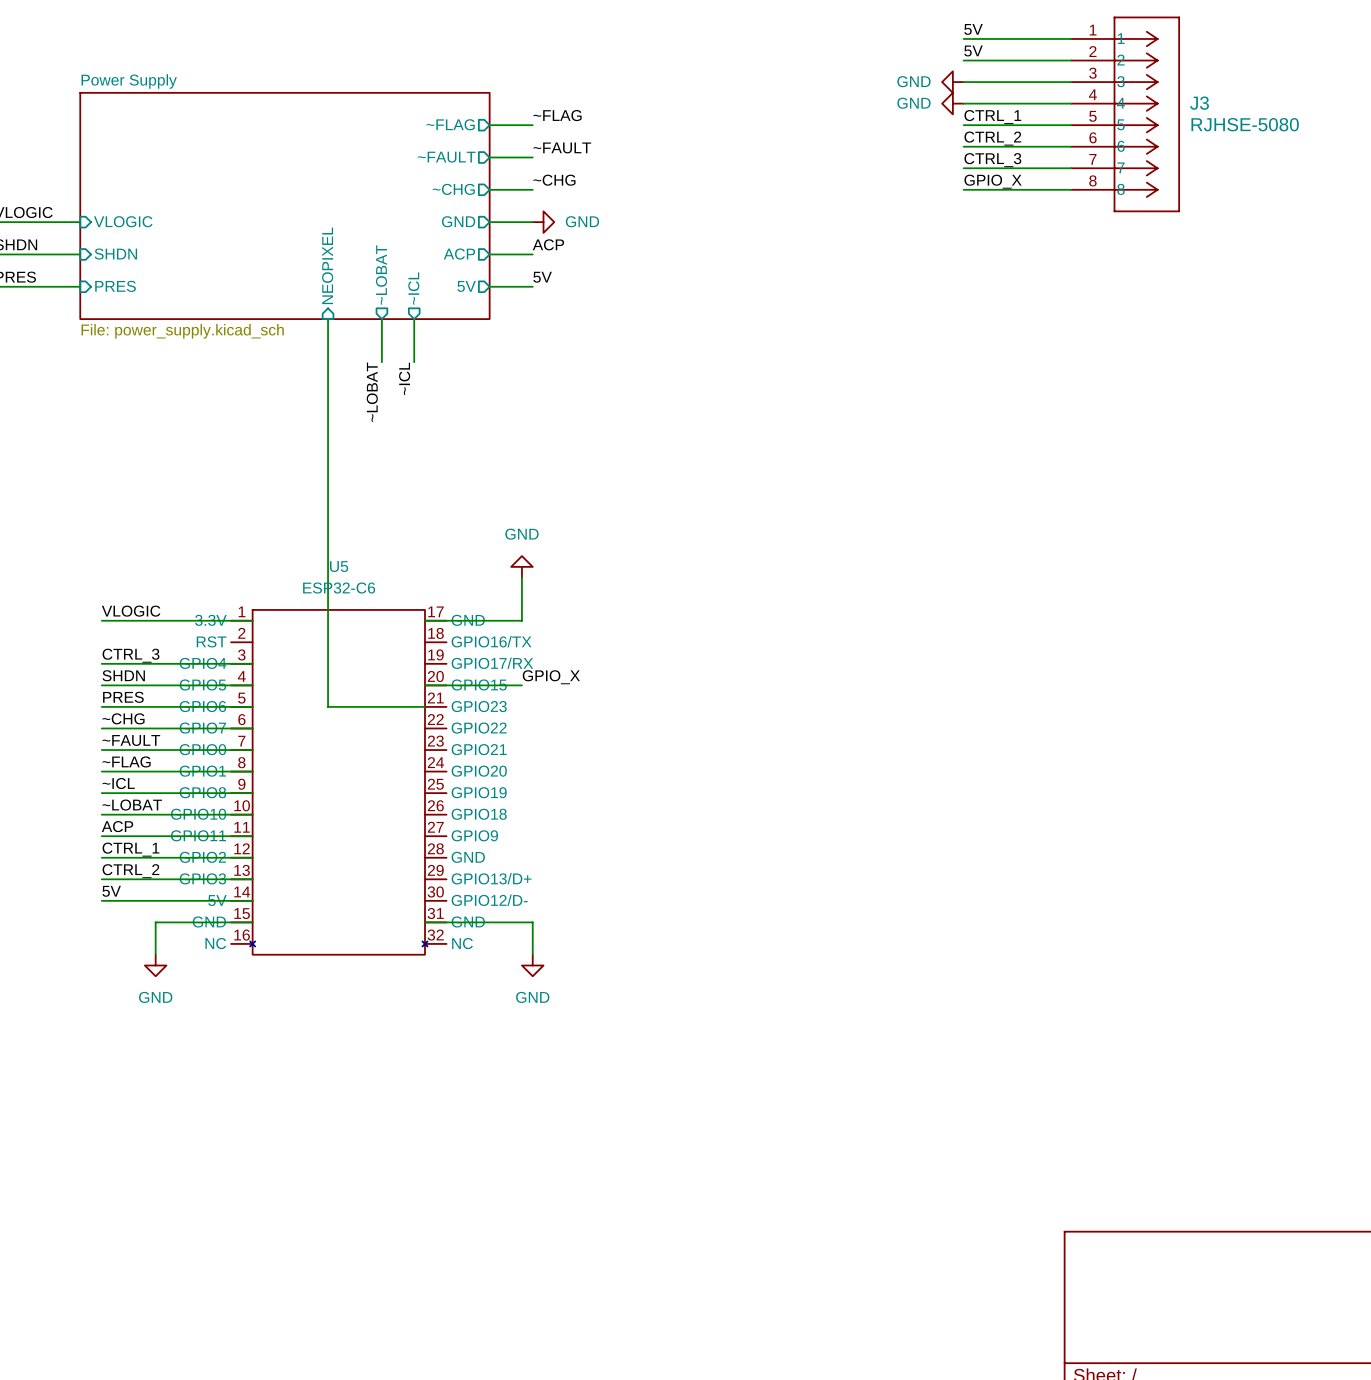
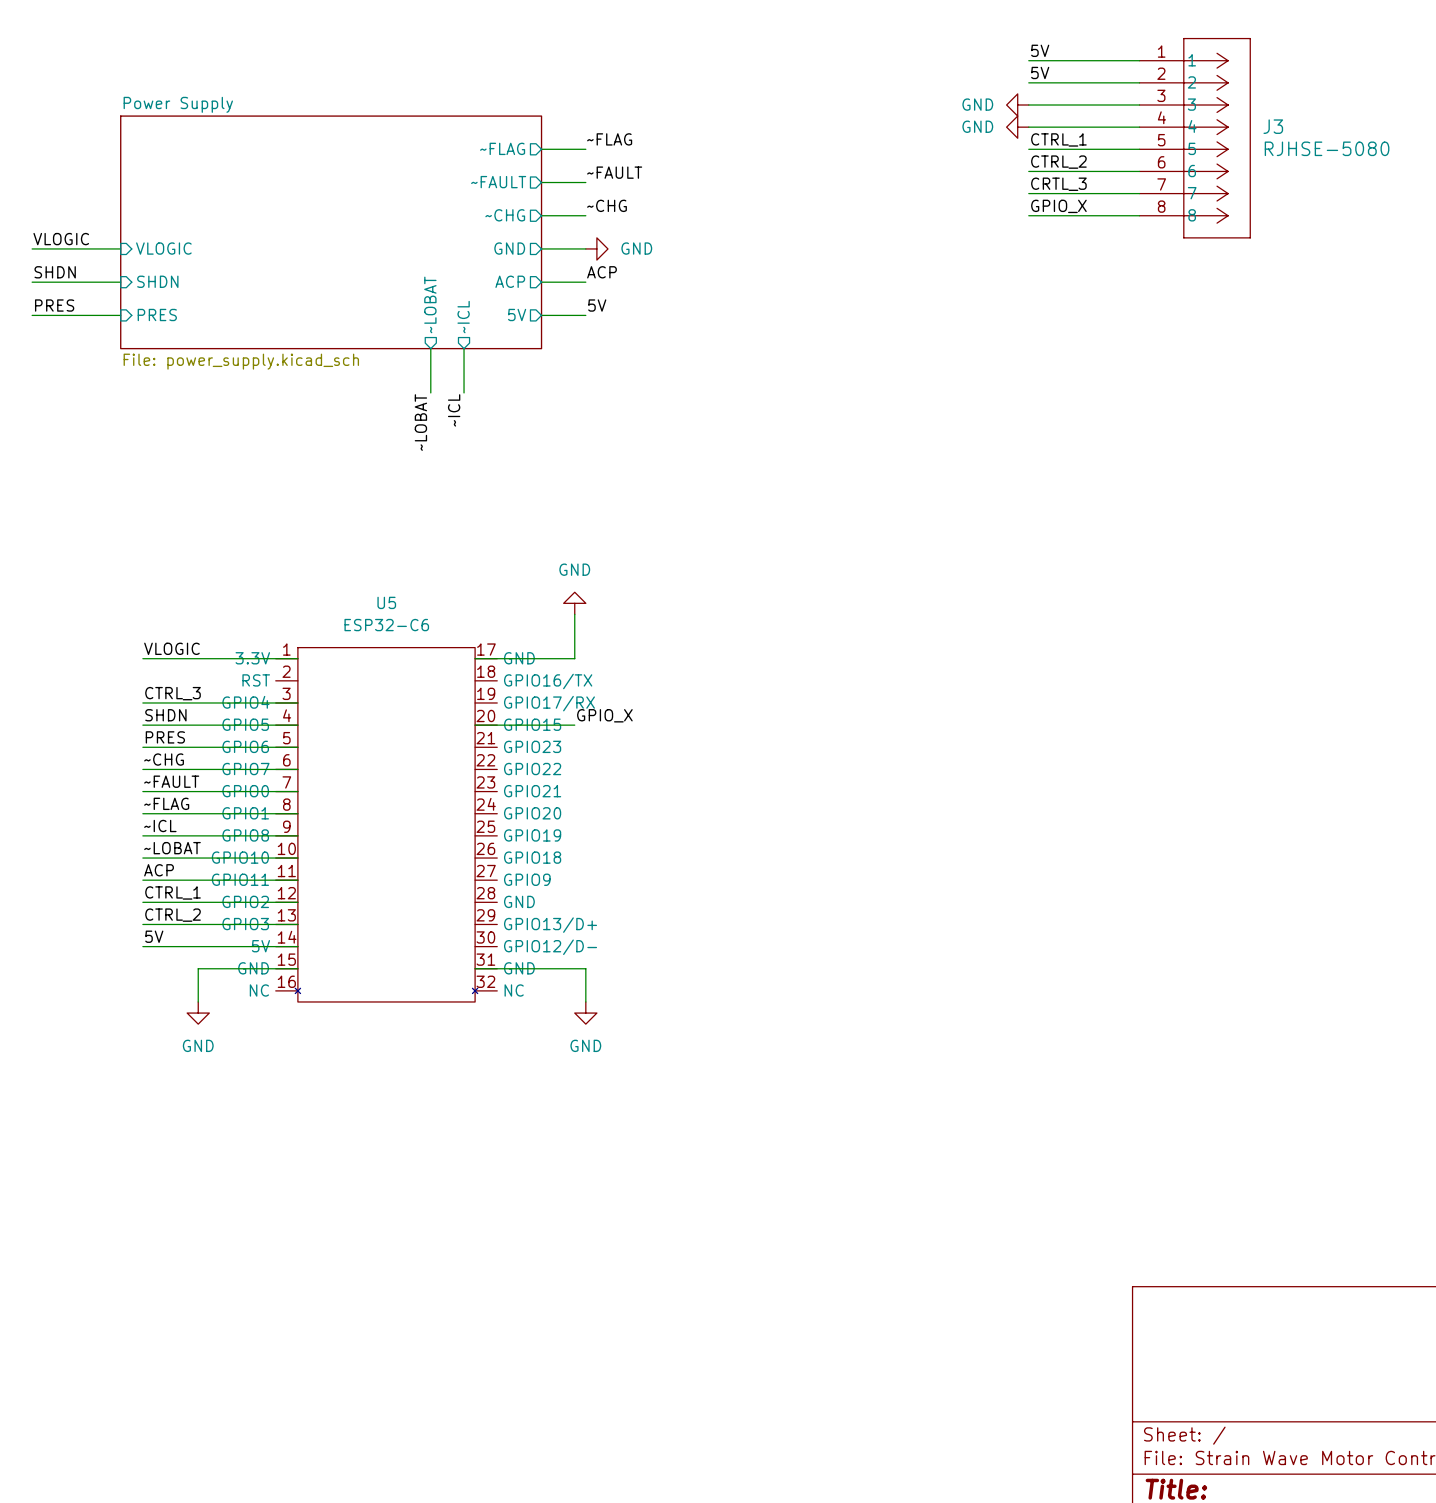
label: CTRL_3 (992, 160) -> CRTL_3 (1058, 184)
sheet pin: NEOPIXEL (327, 265) -> none
wire: (328, 319) (328, 706) (425, 706) -> none

